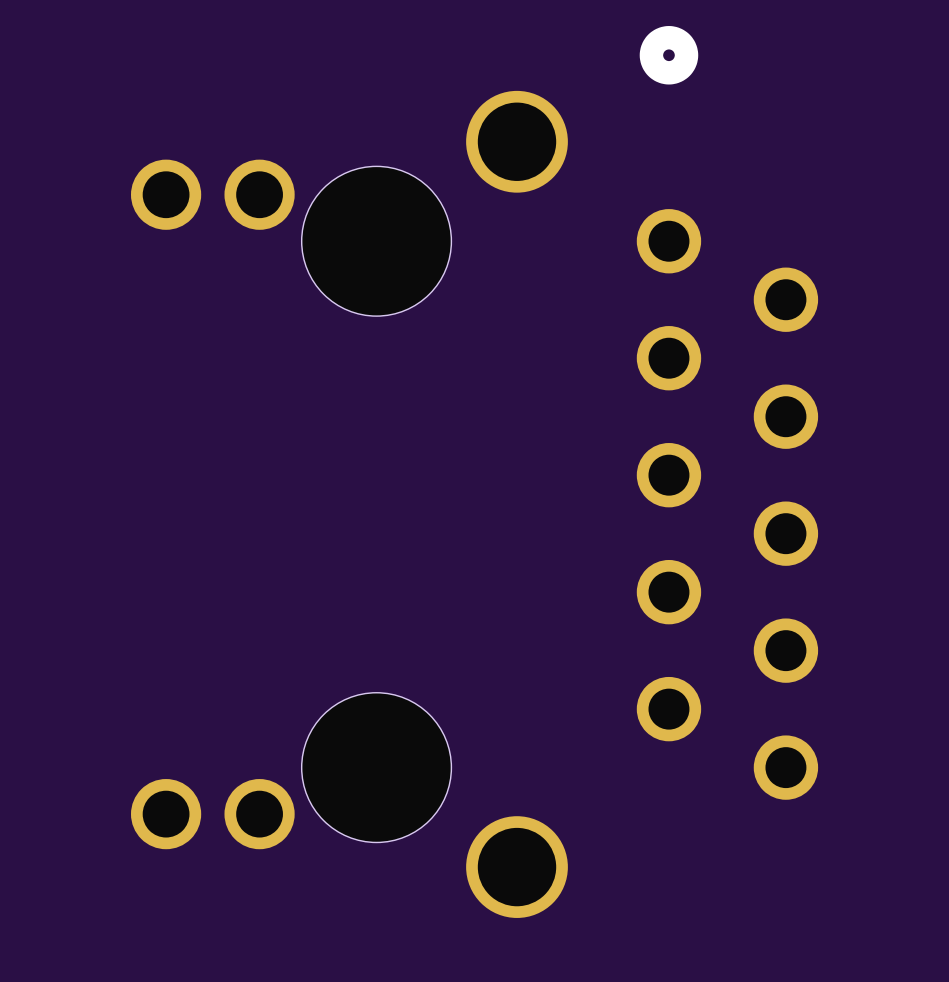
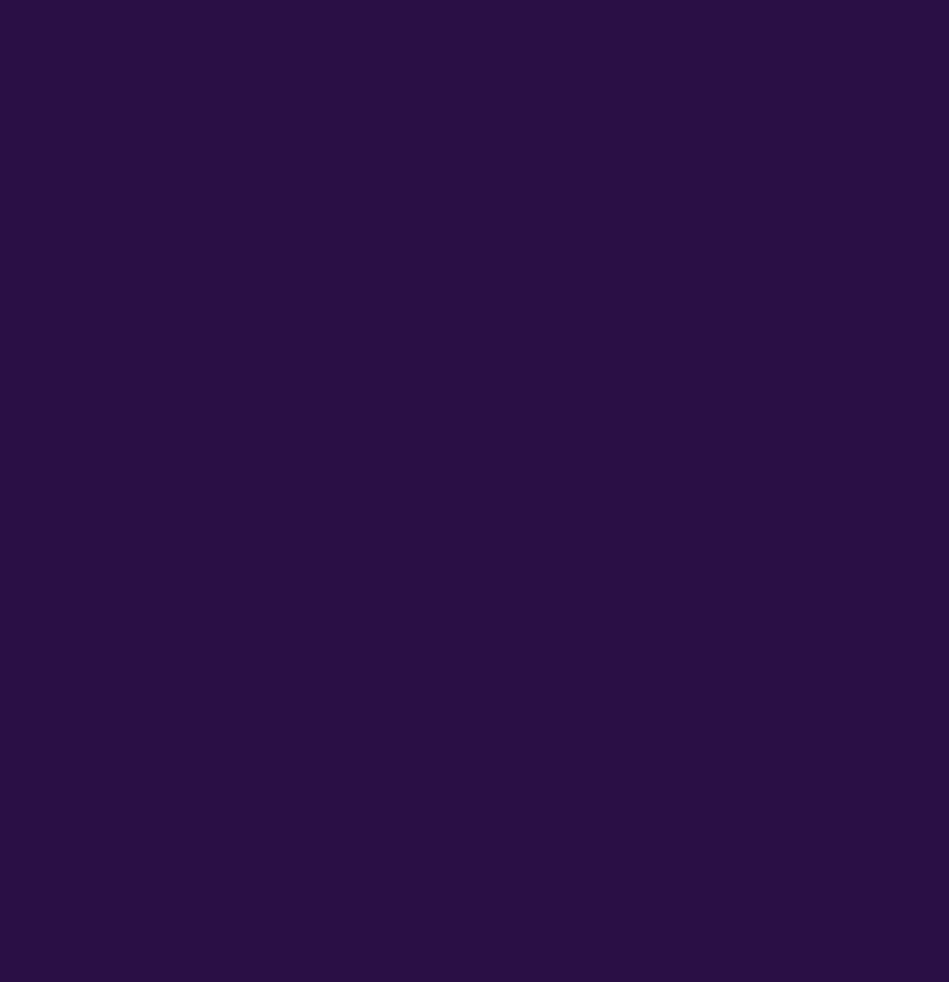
part: (474, 471) -> none

